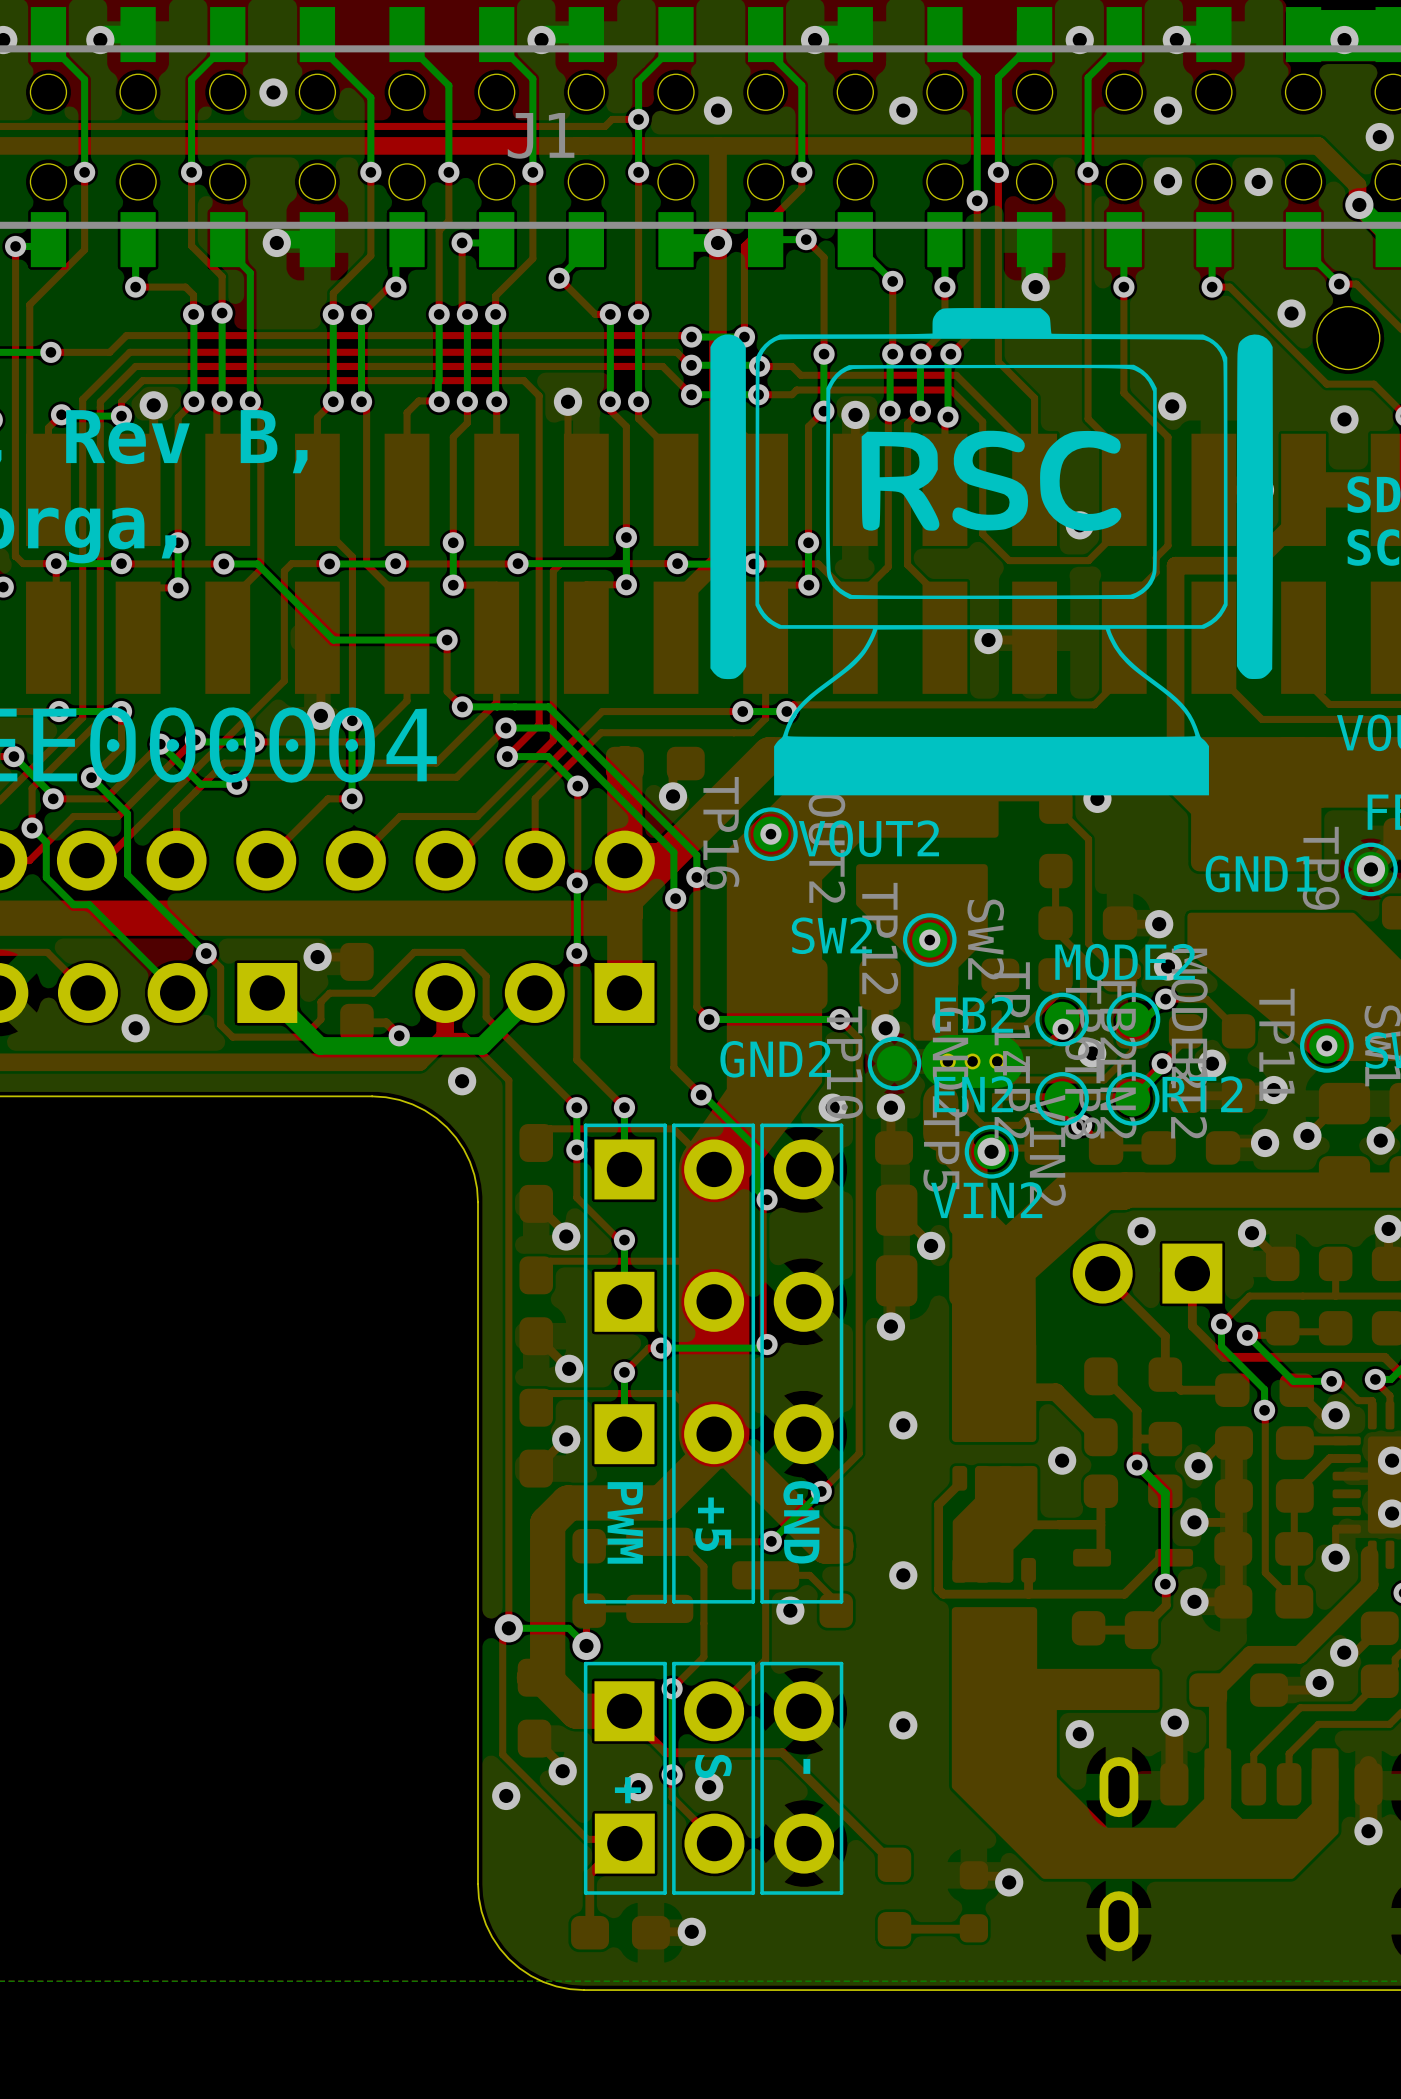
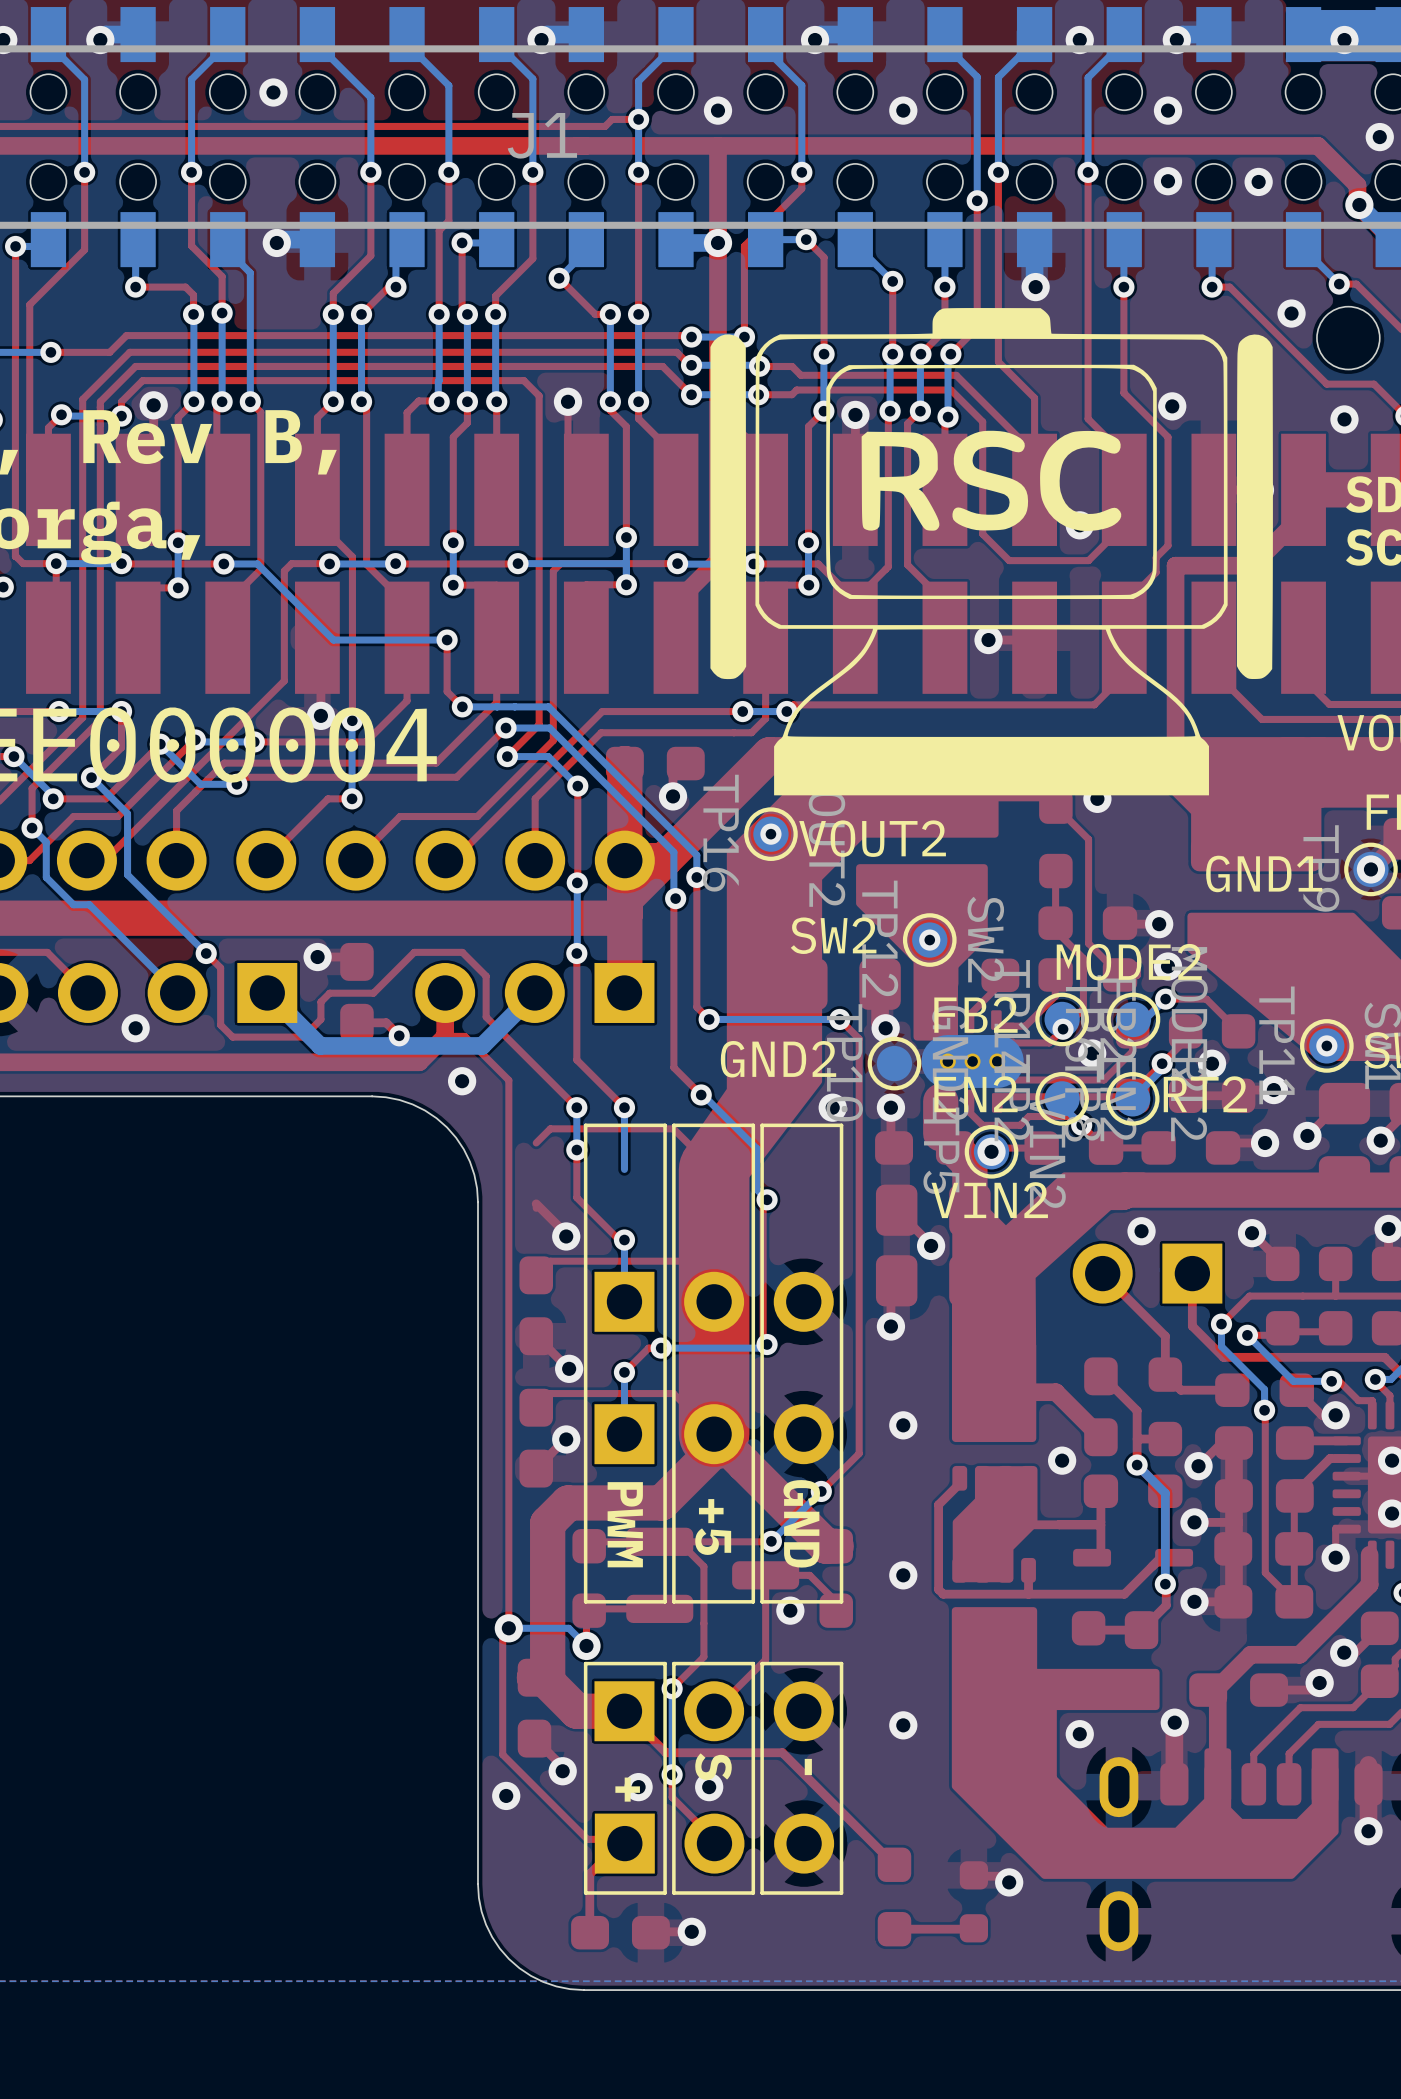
part: (714, 1169) -> none
part: (536, 1173) -> none

